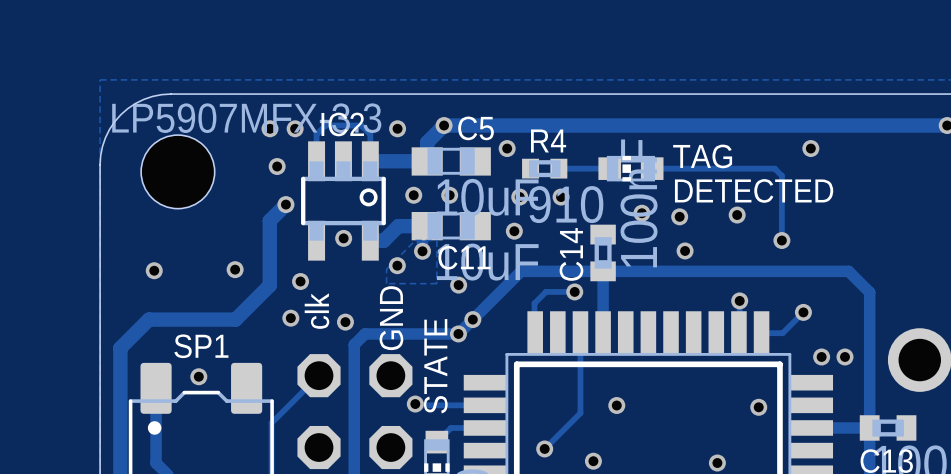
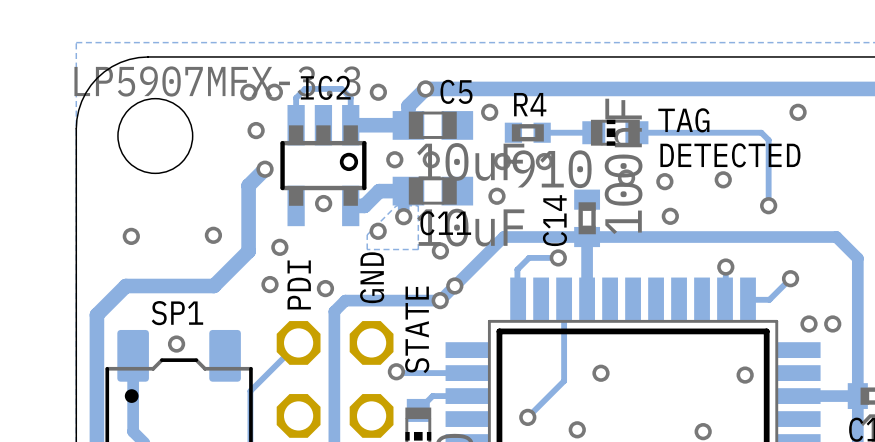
text: clk (316, 311) -> PDI (299, 284)

